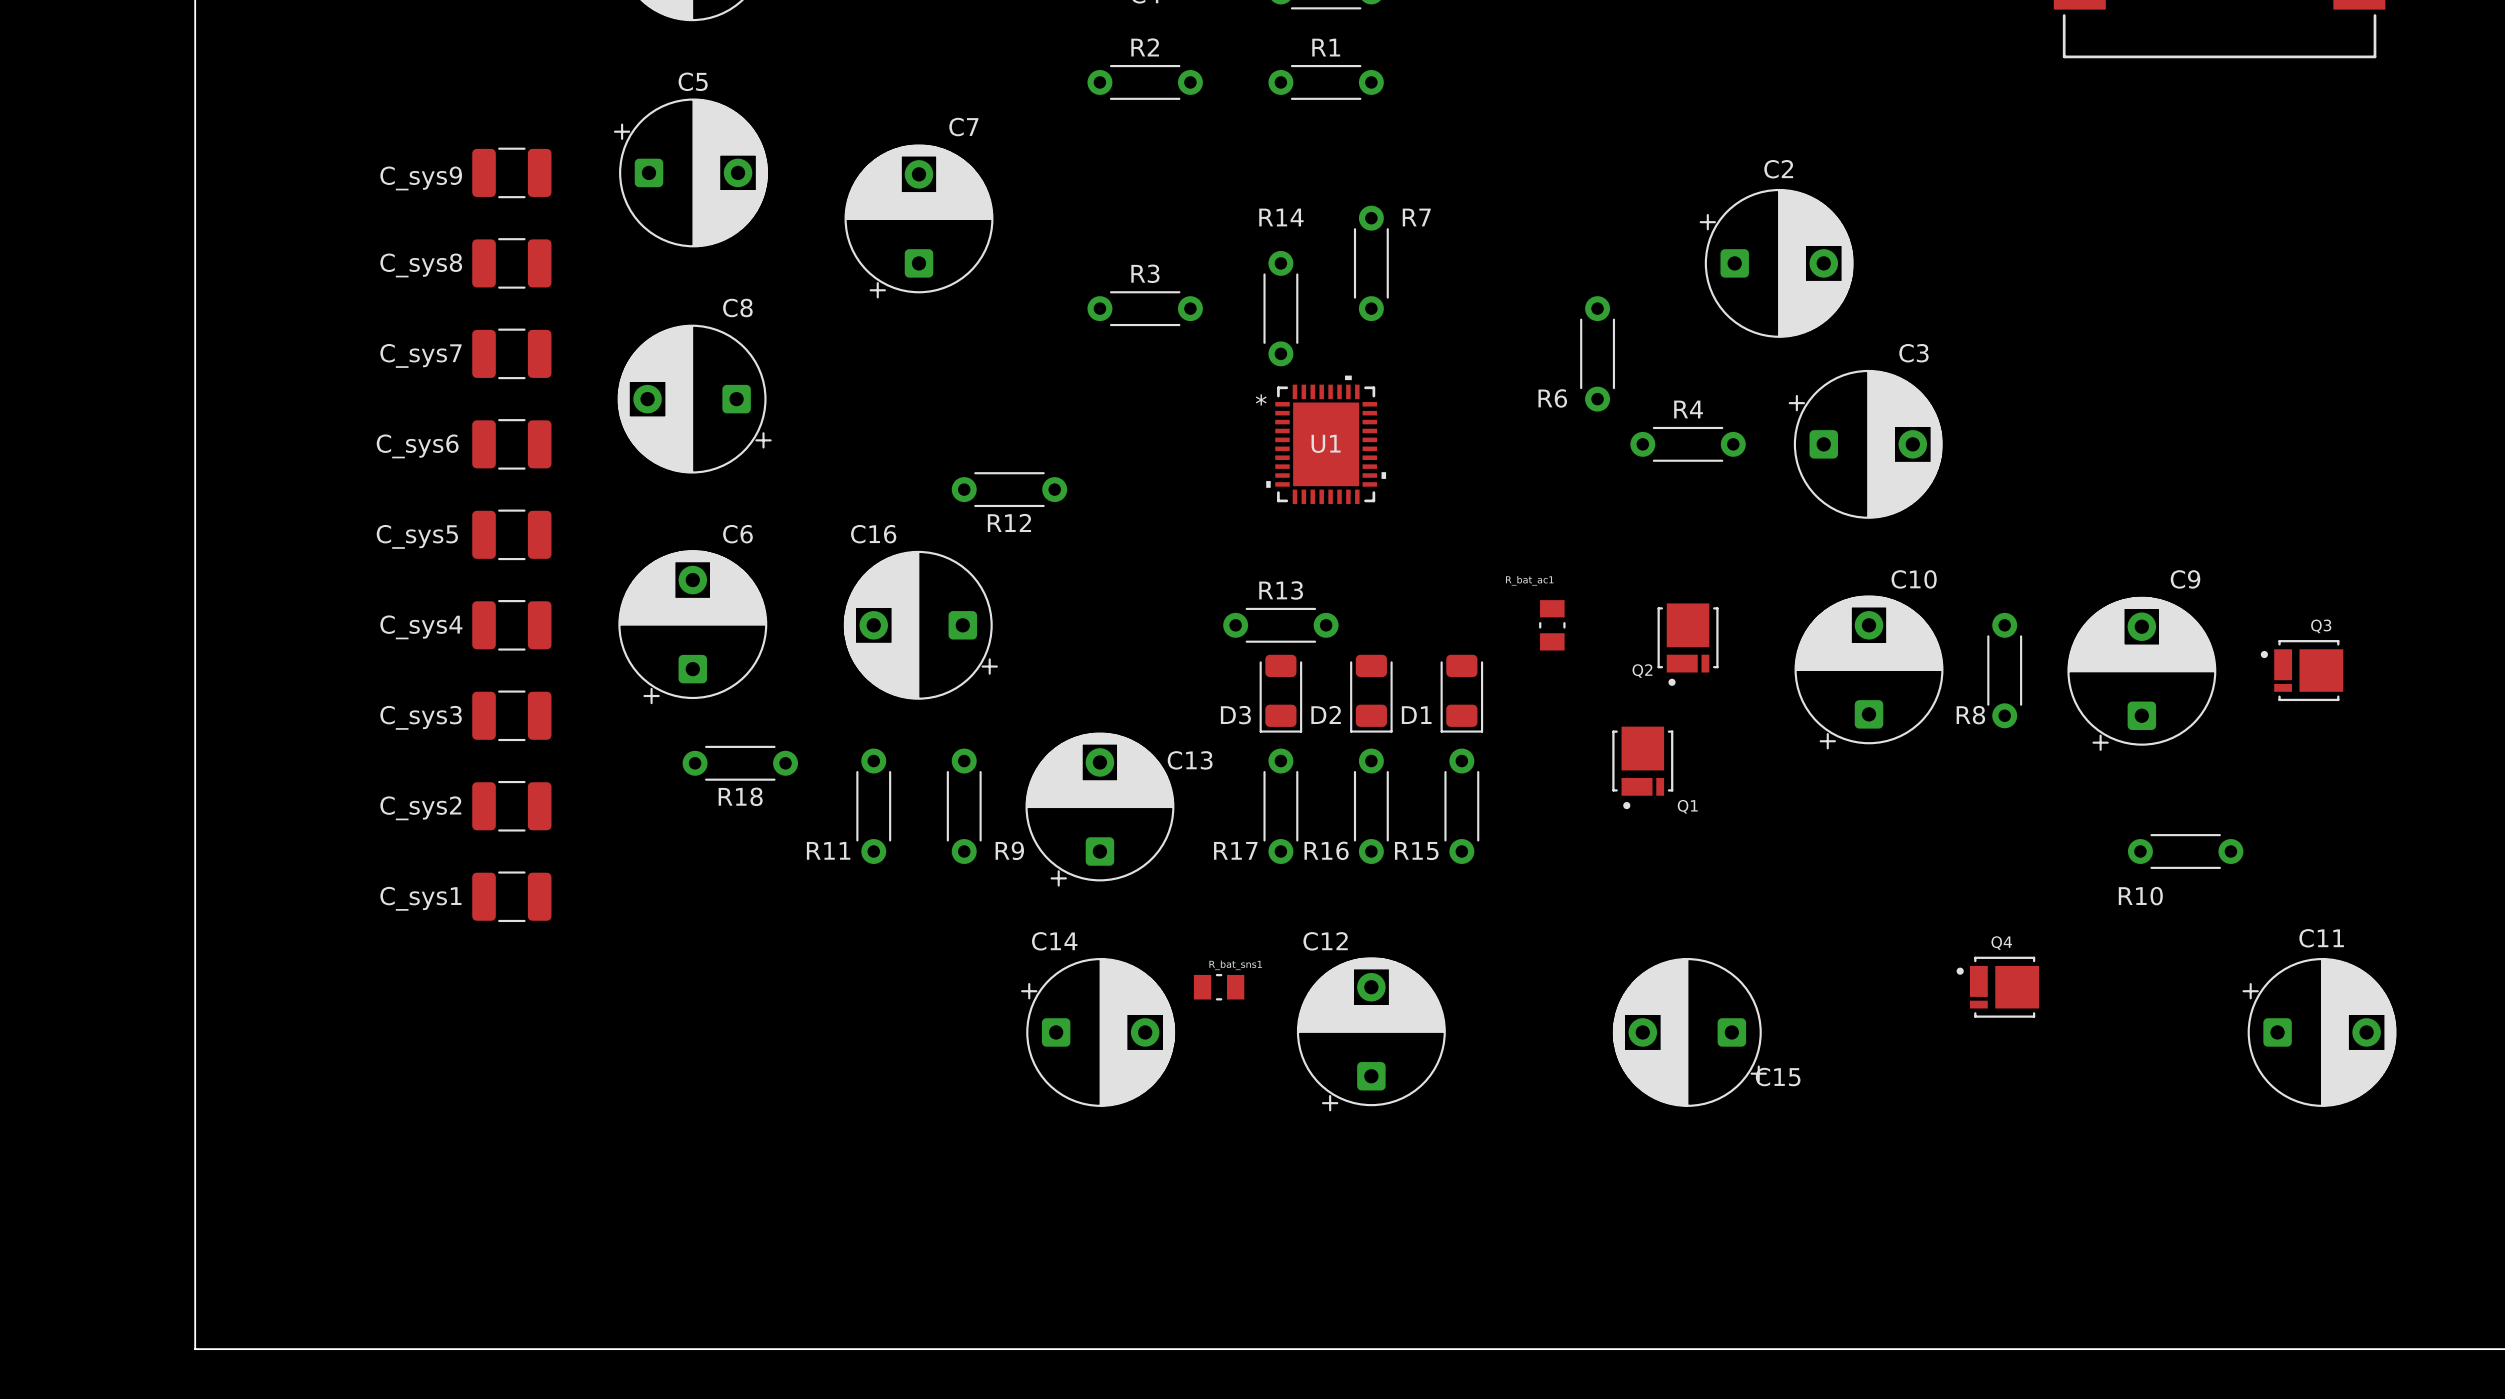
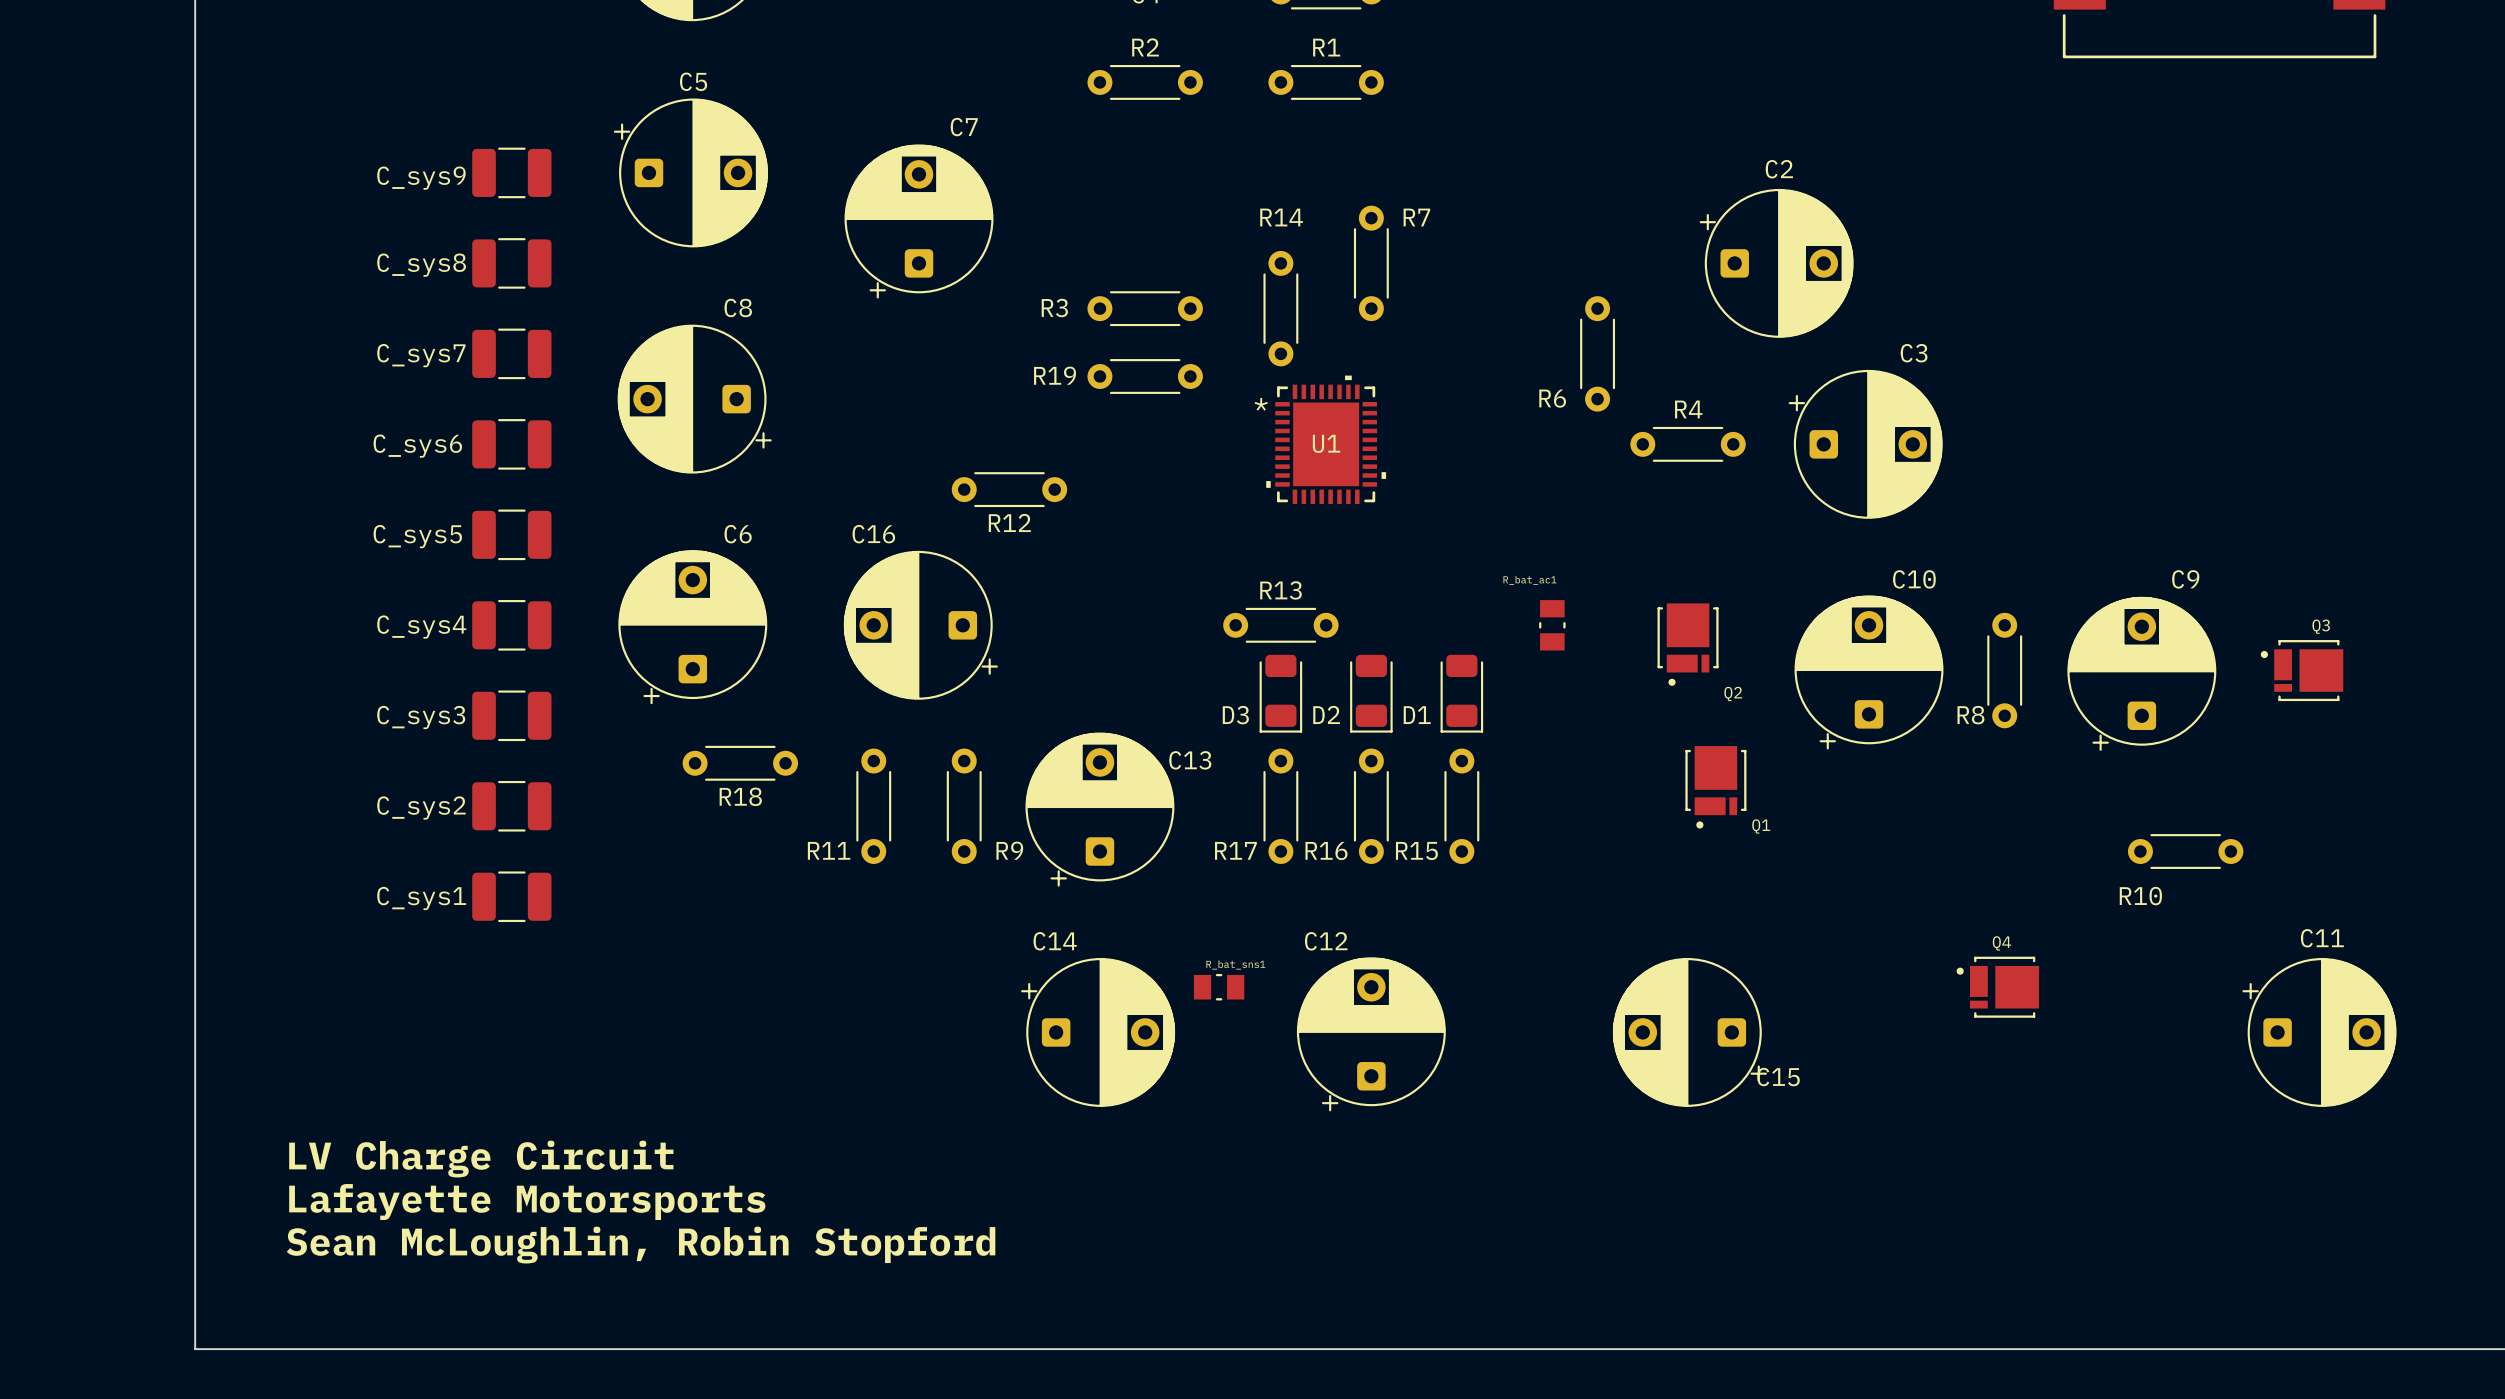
R3 name position: R3 (1145, 273) -> R3 (1054, 307)
R19: none -> (1145, 376)
Q2 name position: Q2 (1642, 671) -> Q2 (1733, 693)
Q1 position: (1642, 767) -> (1715, 787)
text: none -> LV Charge Circuit (481, 1159)
text: none -> Lafayette Motorsports (527, 1202)
text: none -> Sean McLoughlin, Robin Stopford (641, 1245)

